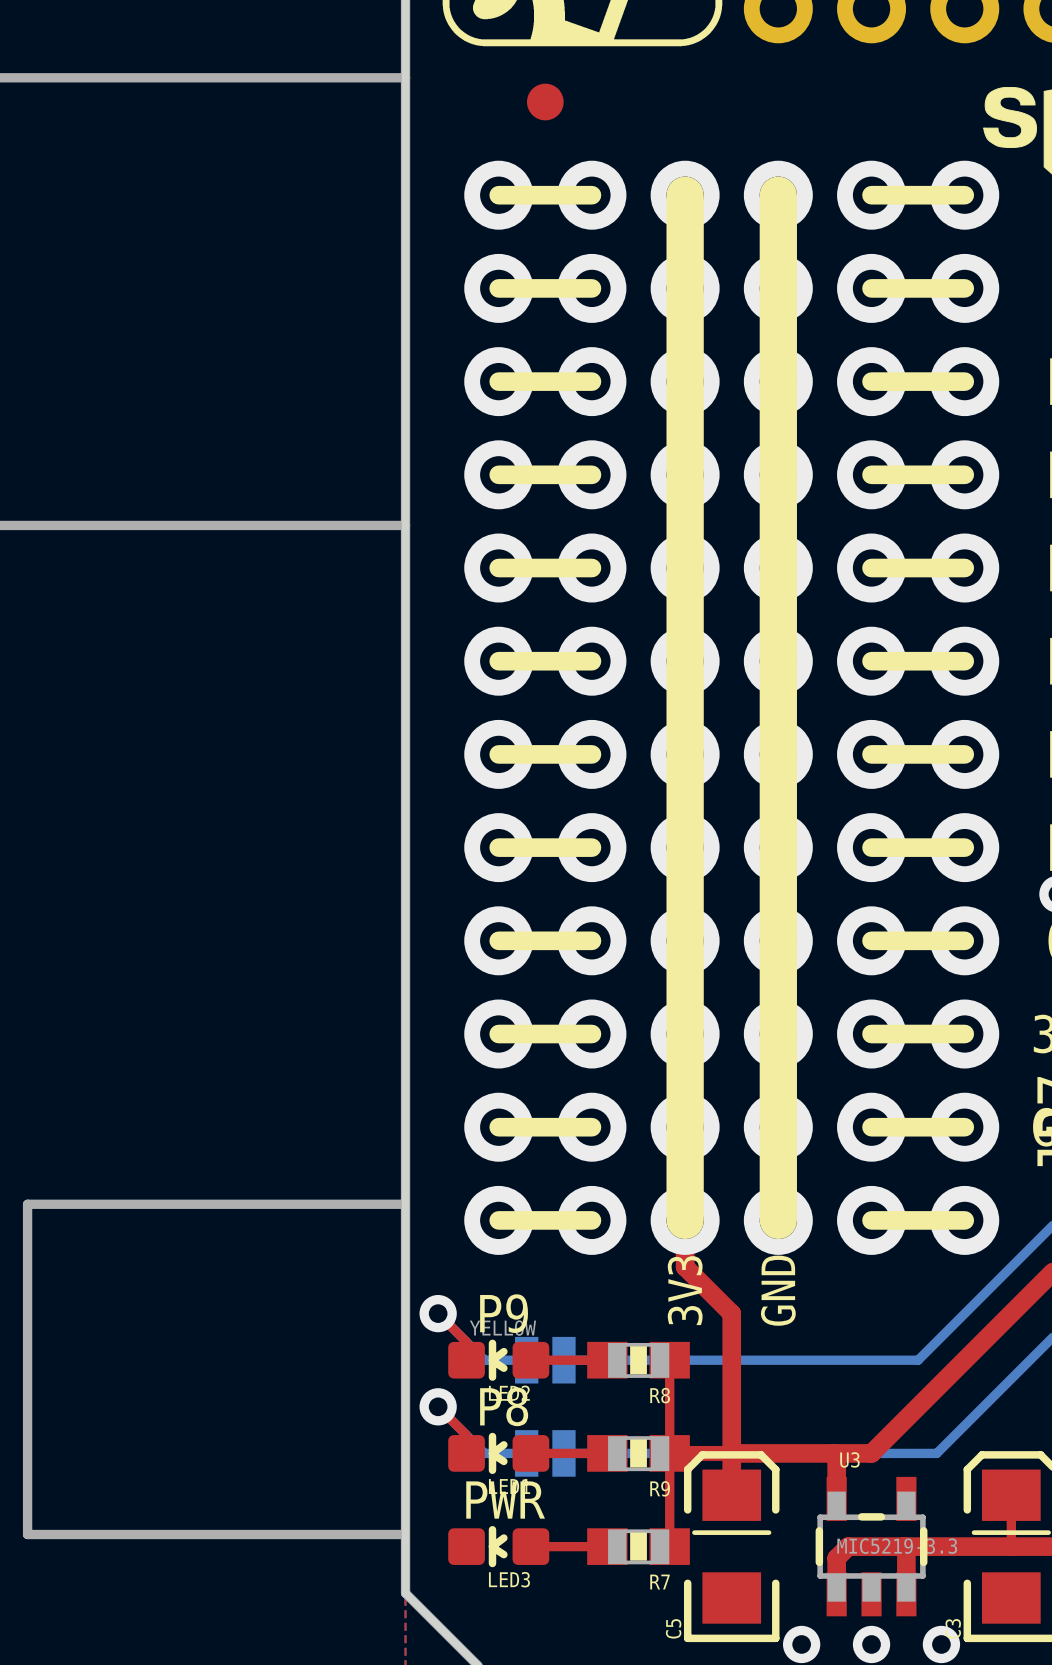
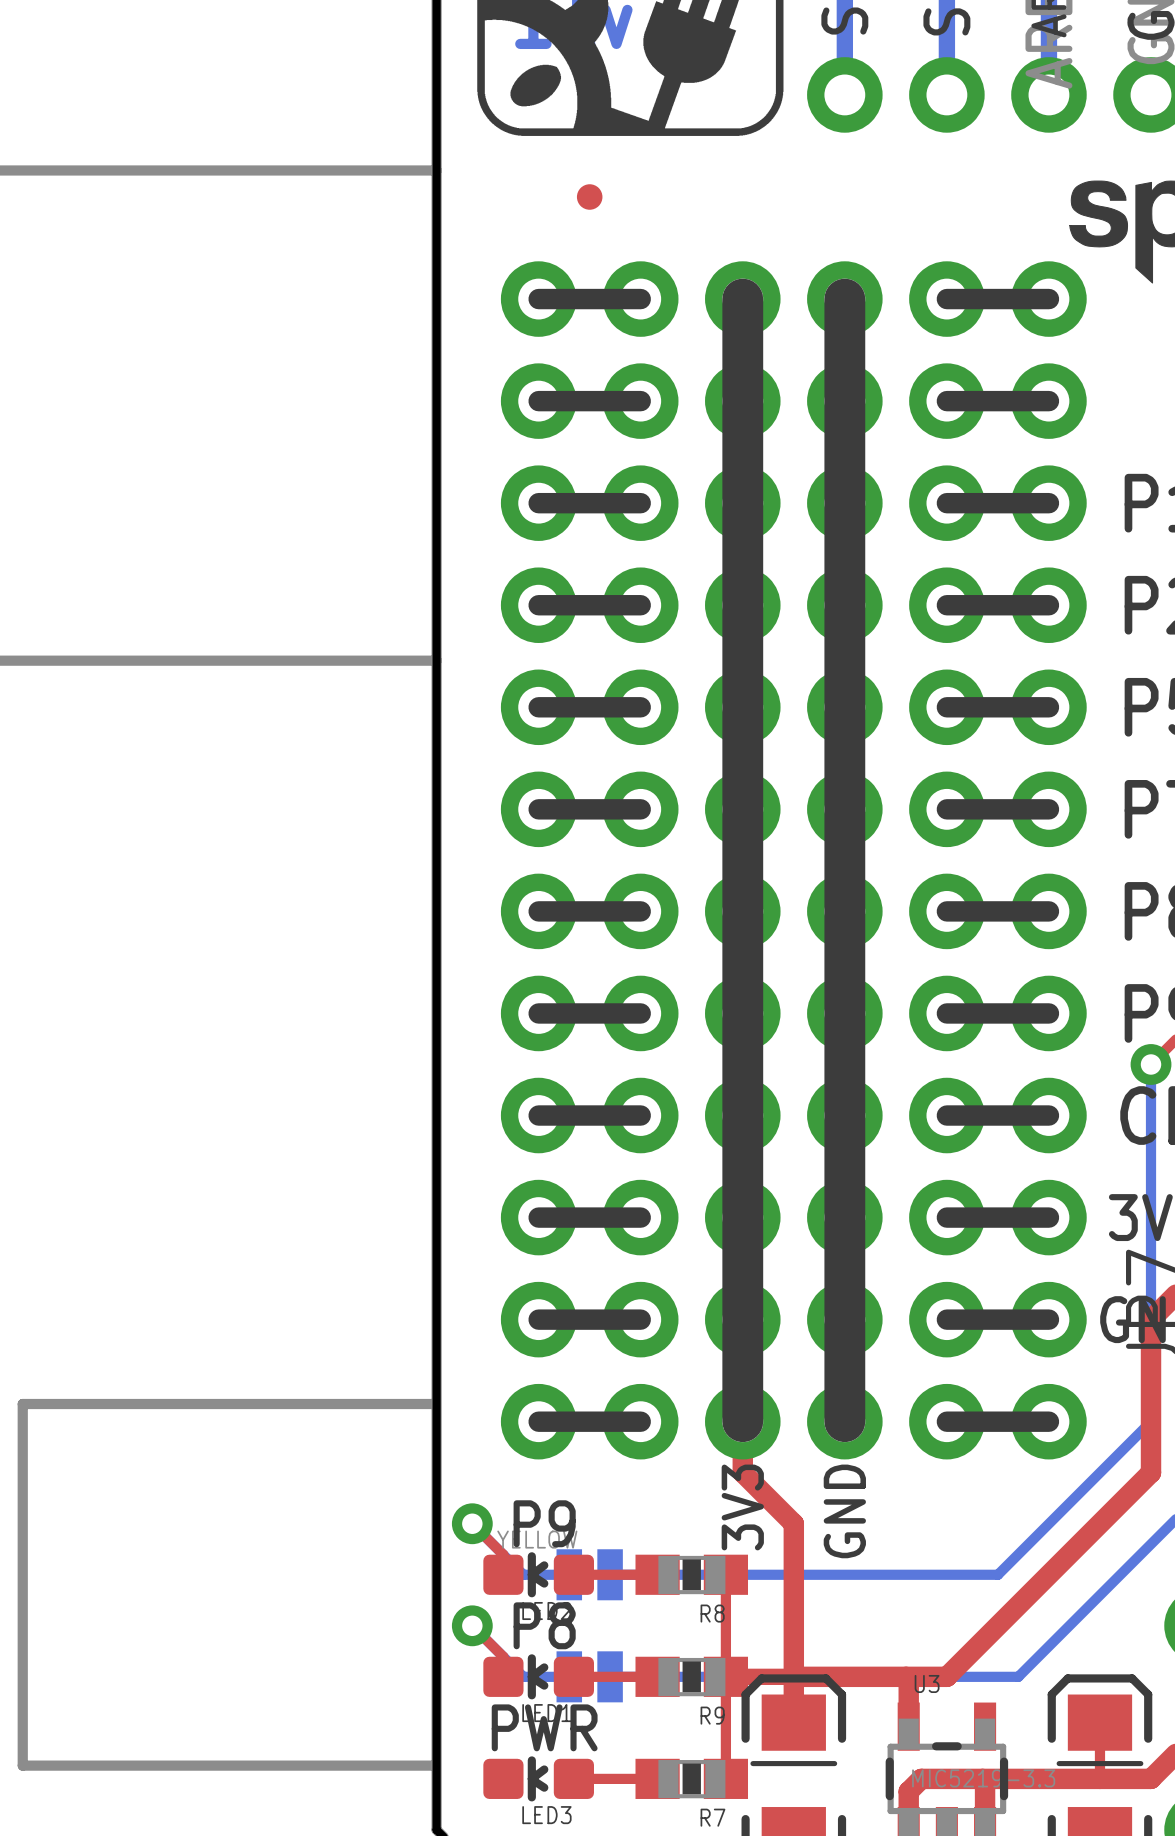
part footprint: [526, 83, 564, 121] -> [576, 184, 603, 210]

